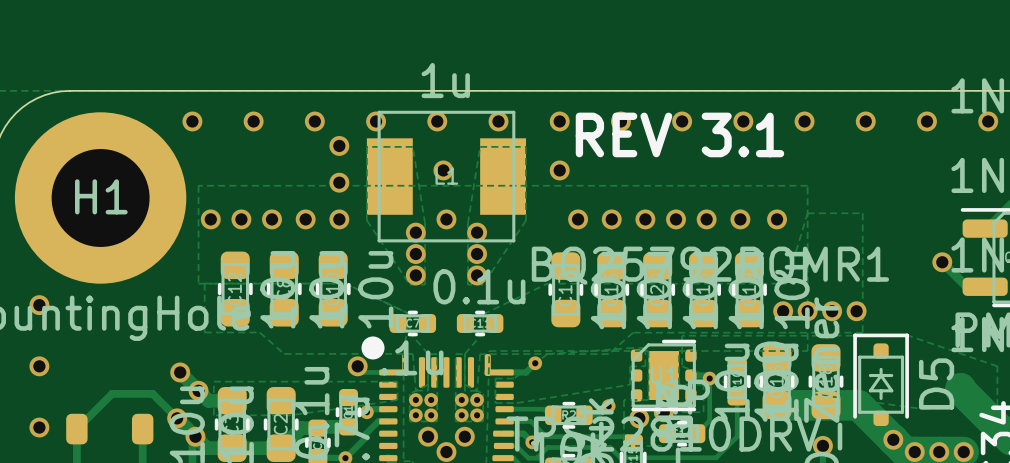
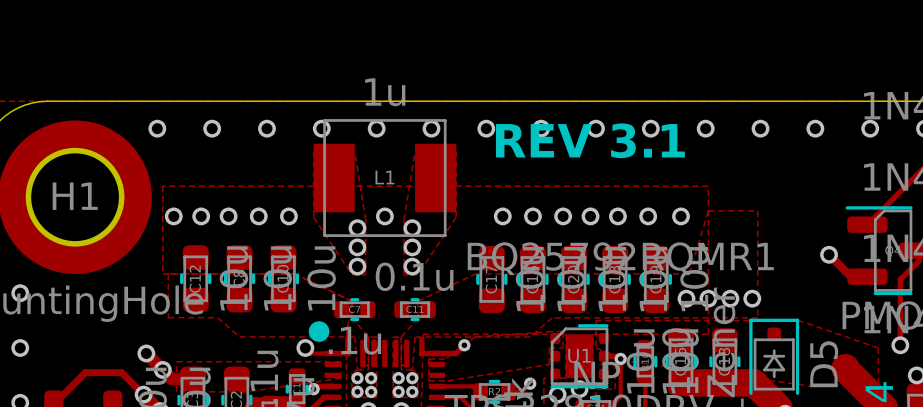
via: (339, 145) -> none
via: (443, 170) -> none
via: (559, 170) -> none
via: (339, 182) -> none

